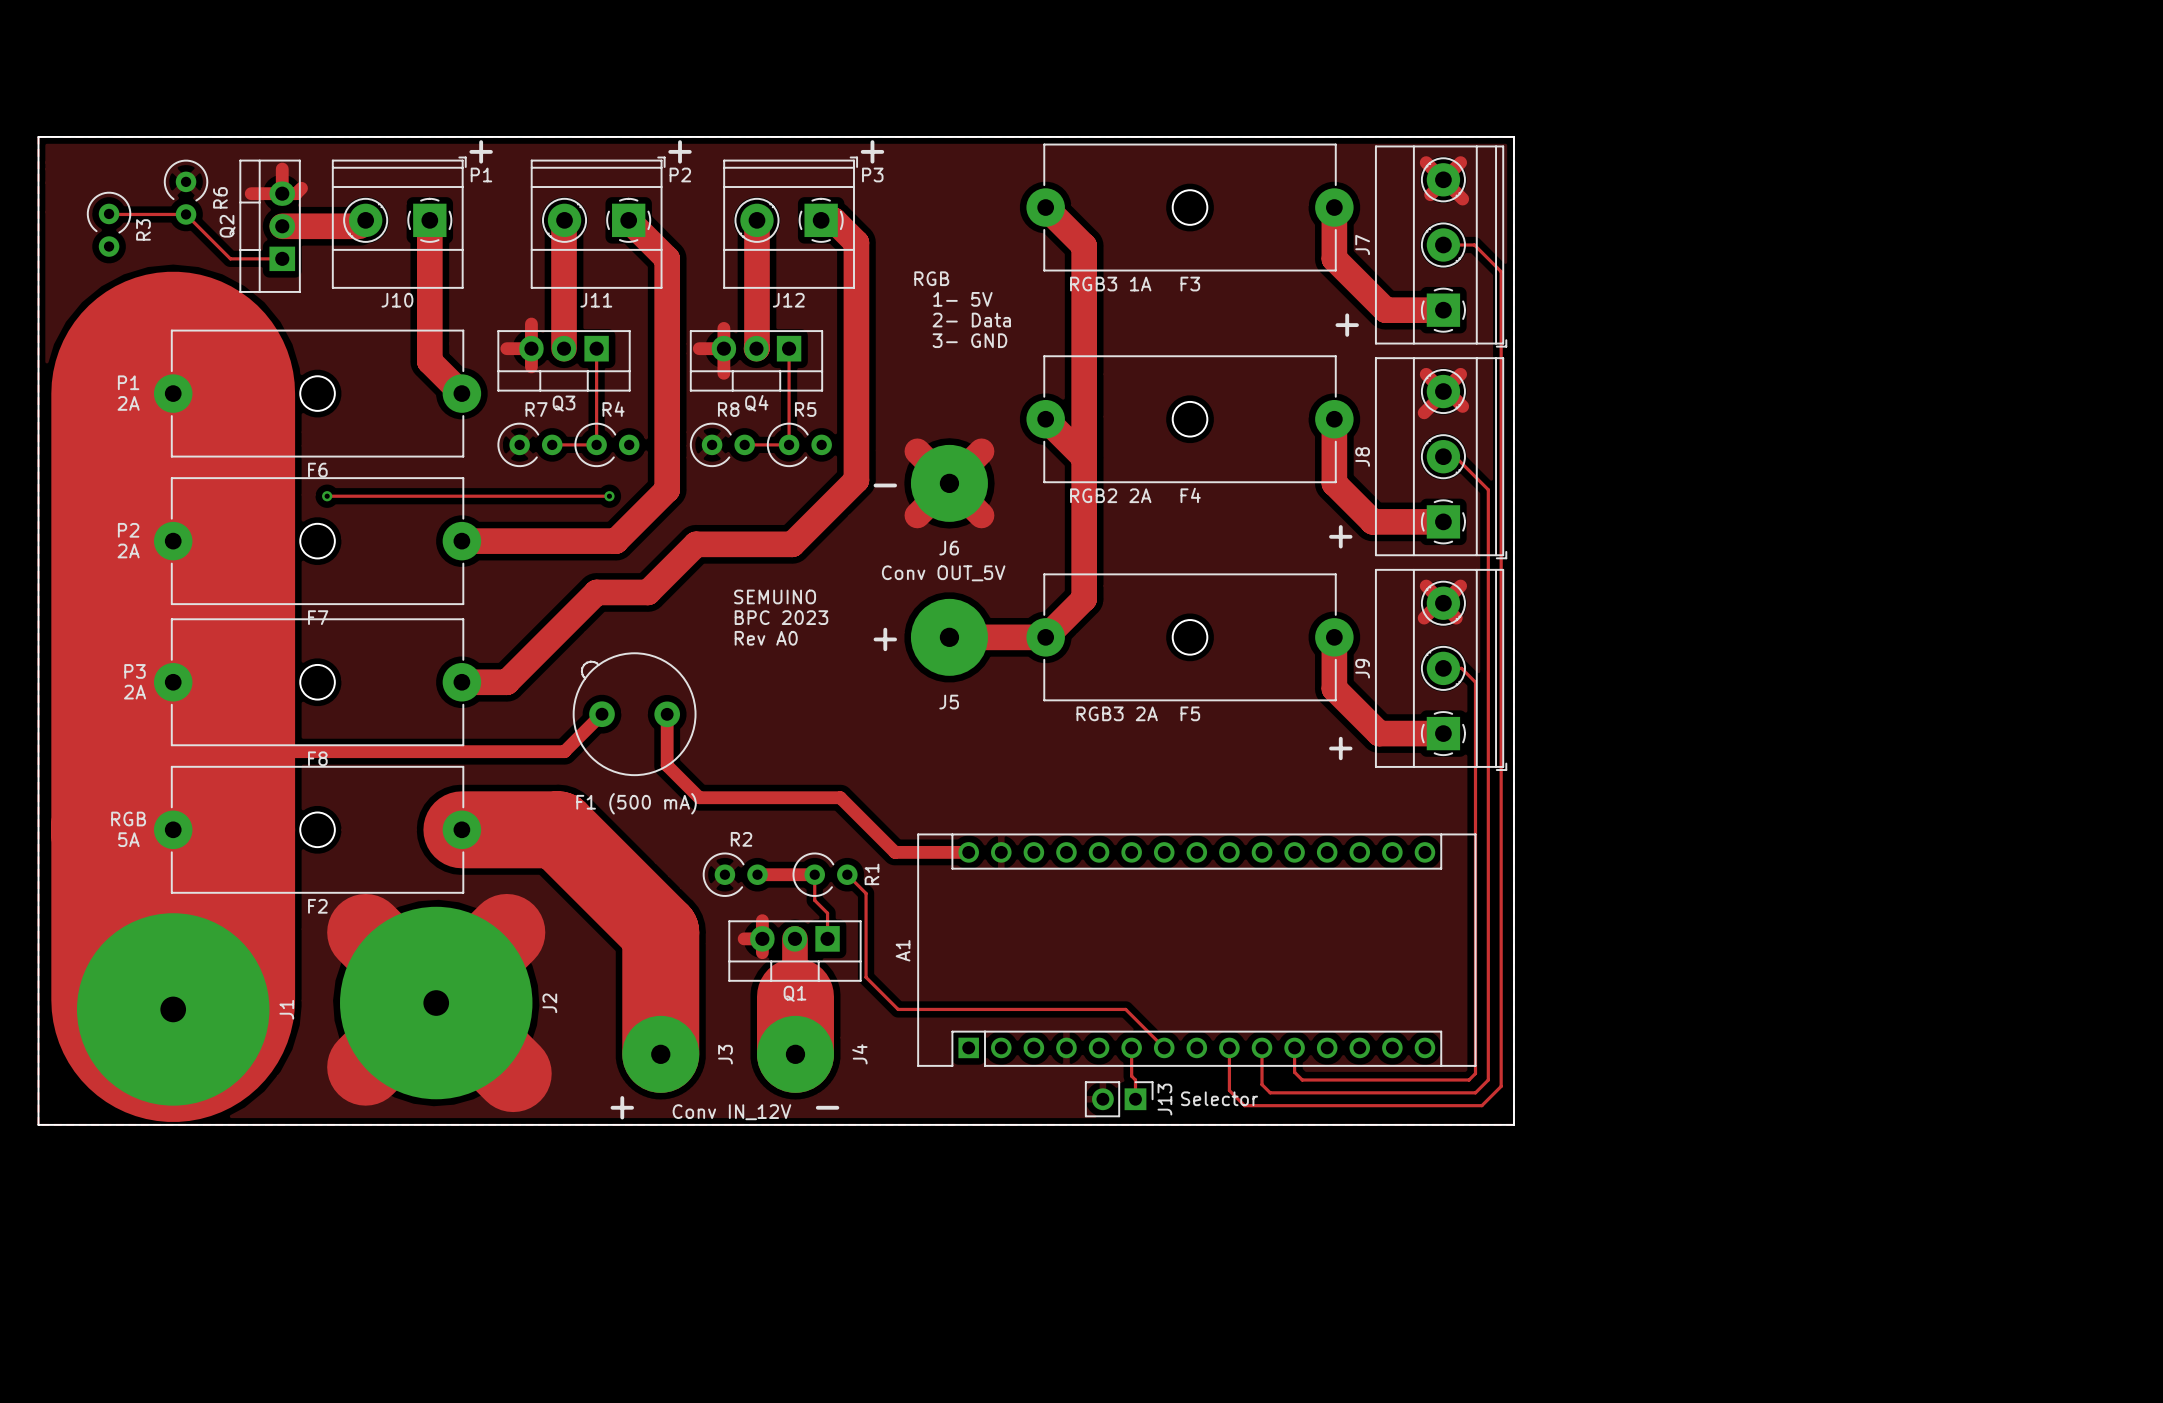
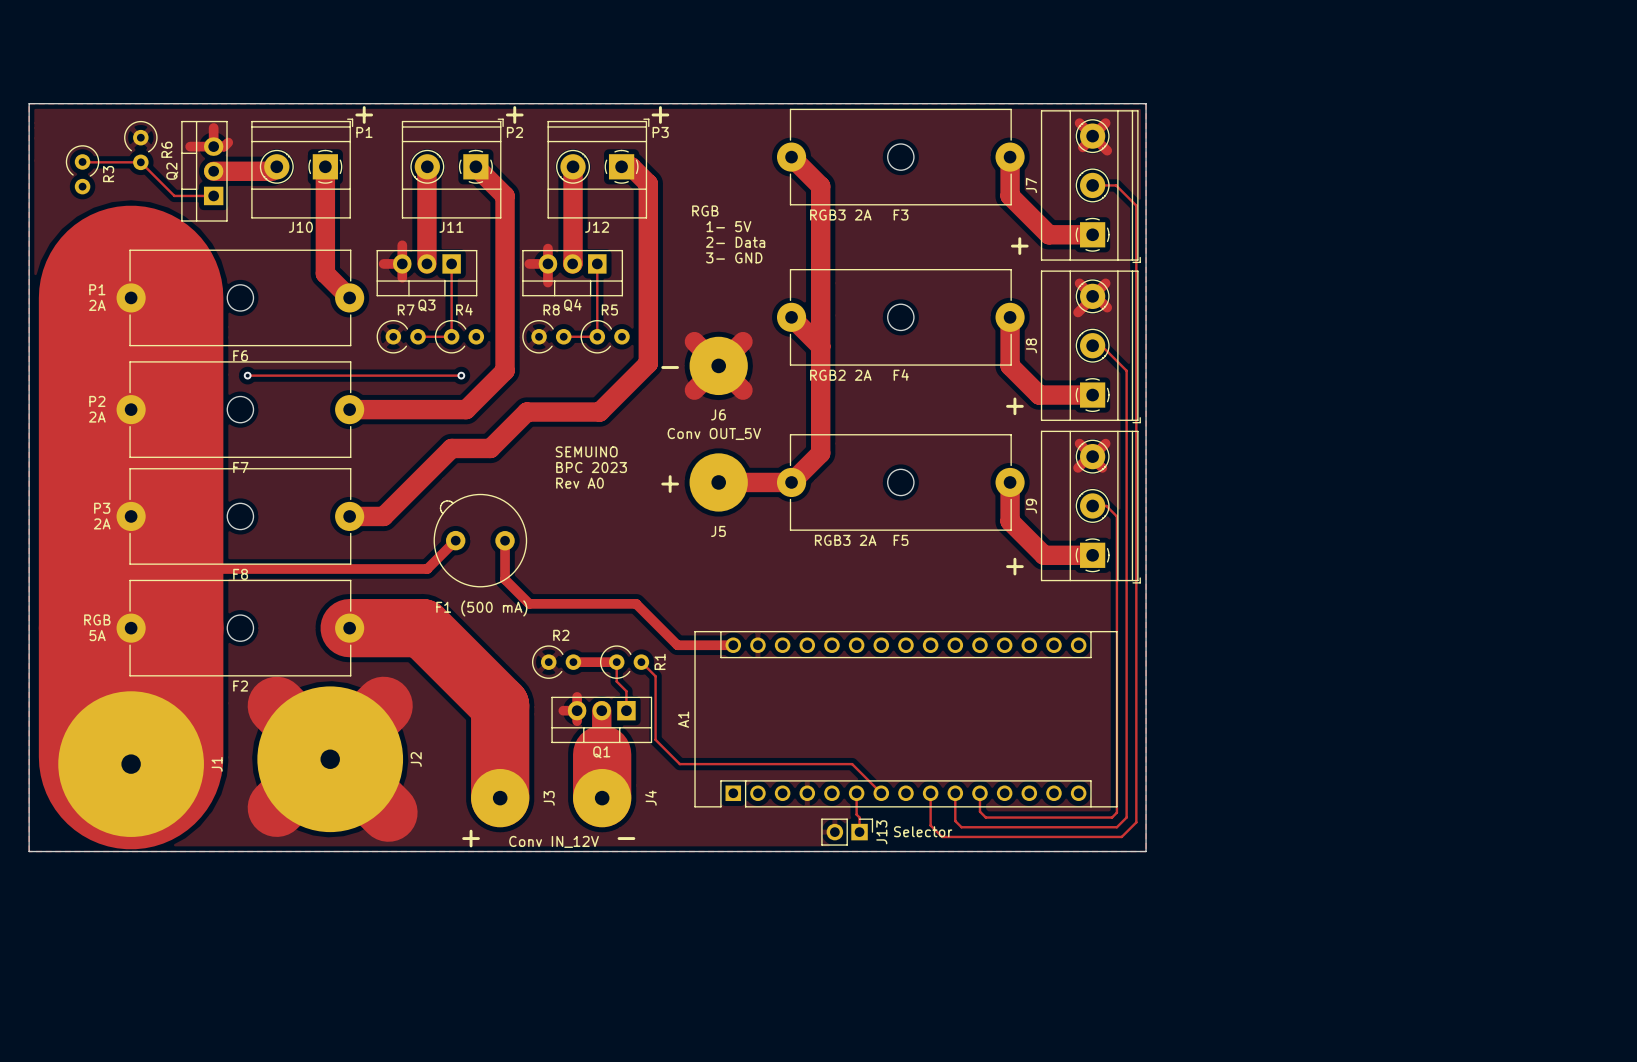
text: RGB3 1A (1110, 284) -> RGB3 2A (840, 215)

